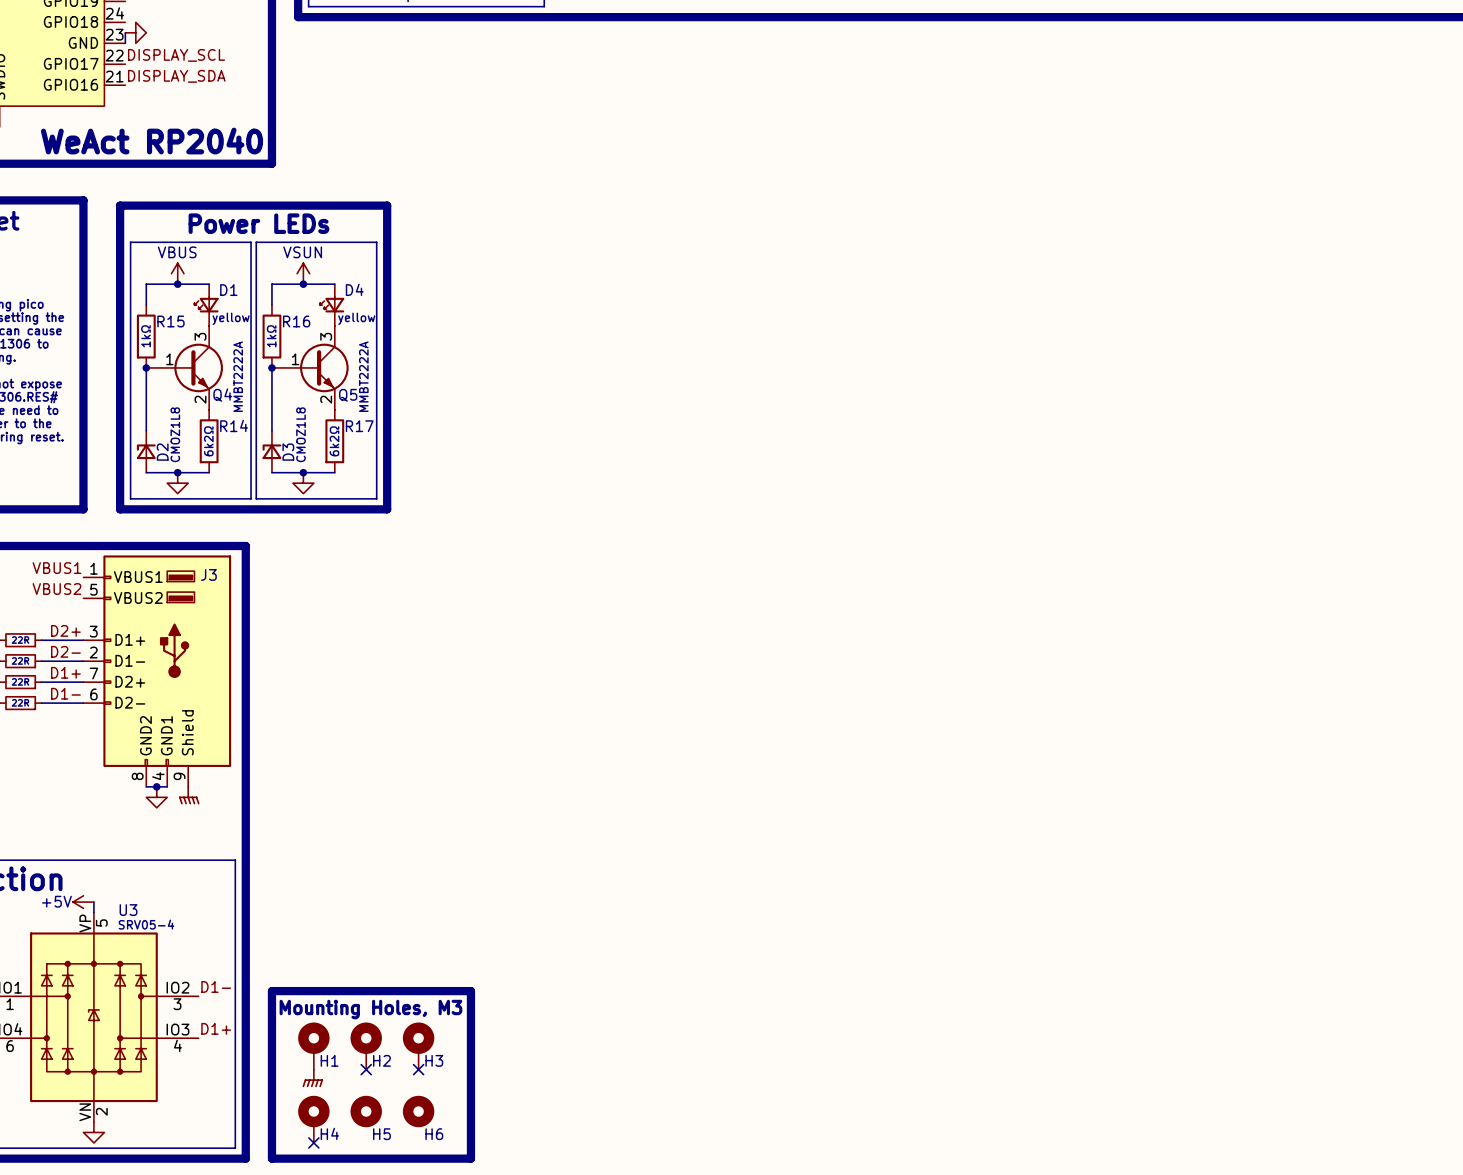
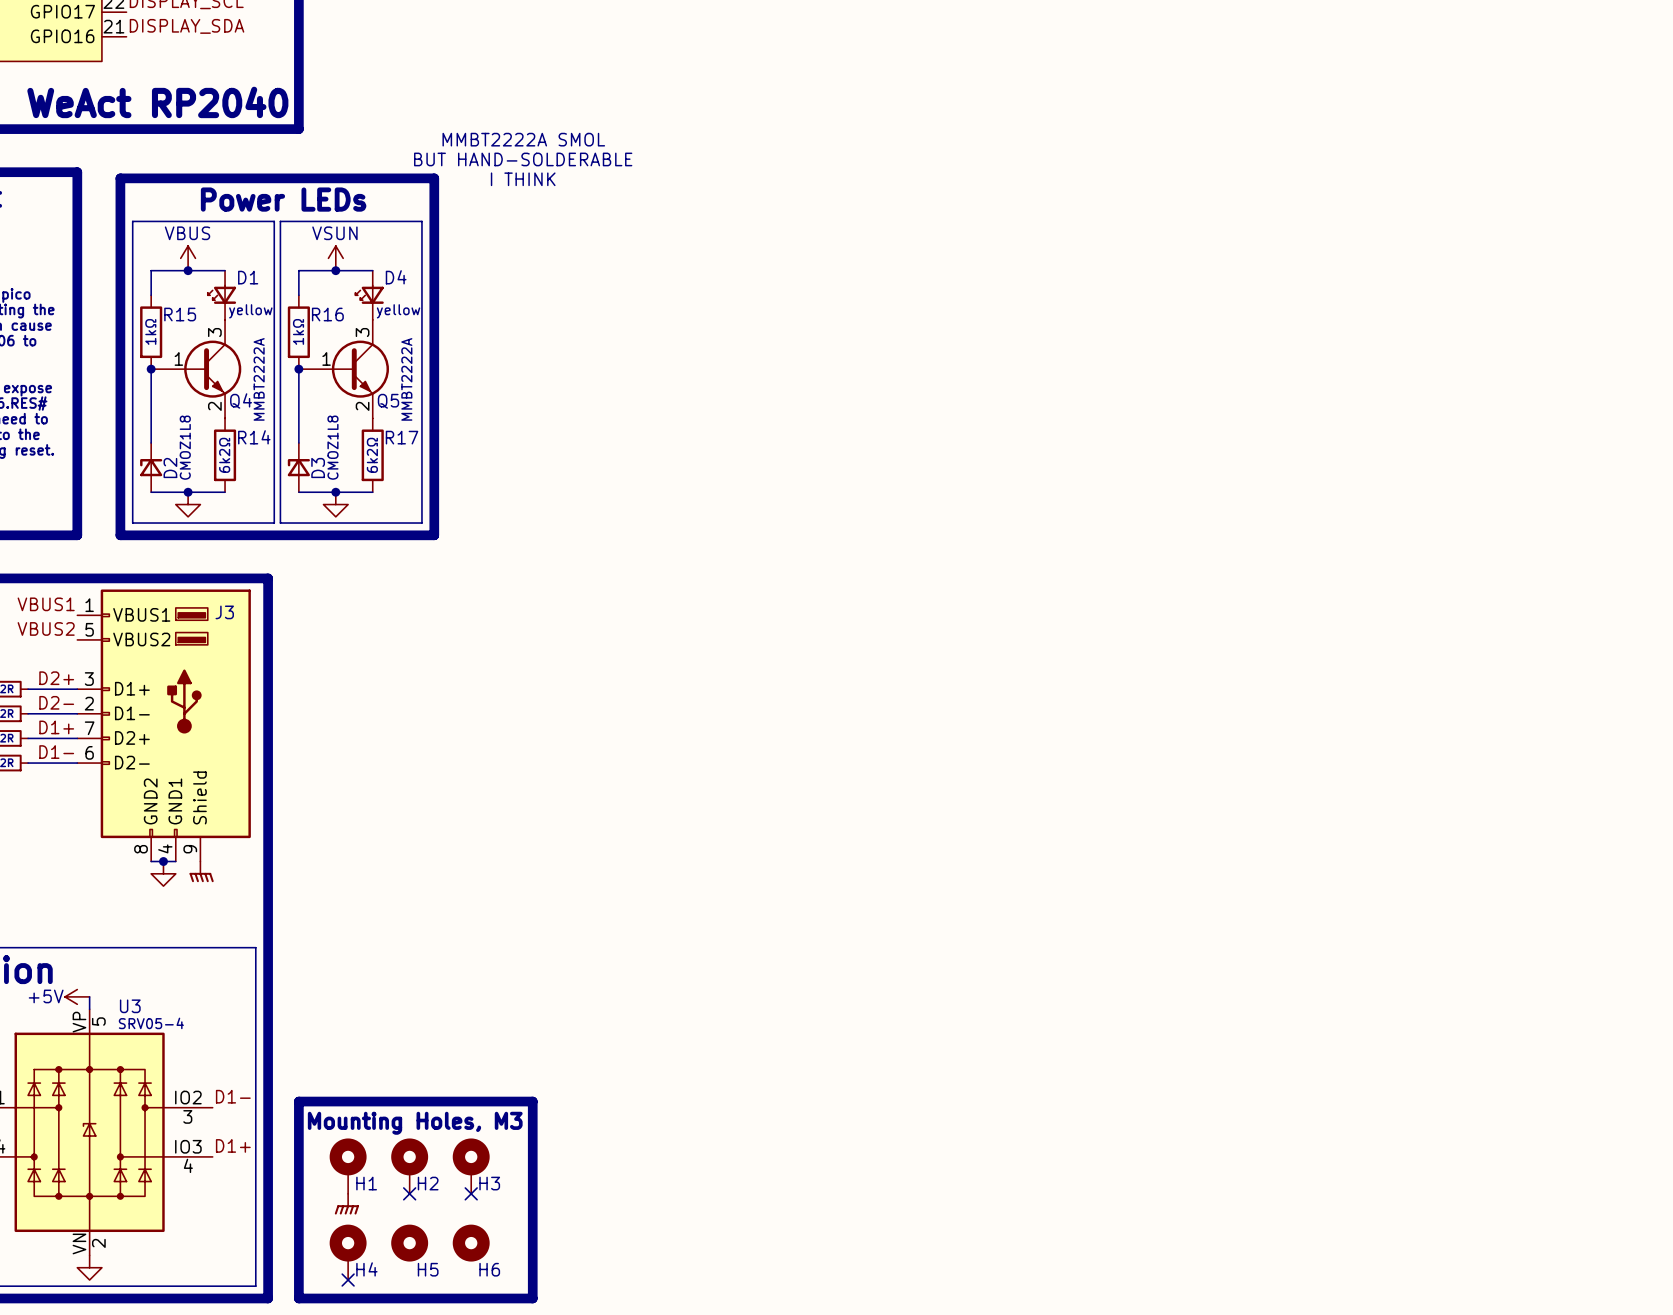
text: none -> MMBT2222A SMOL (523, 139)
text: none -> BUT HAND-SOLDERABLE (523, 159)
text: none -> I THINK (523, 179)

